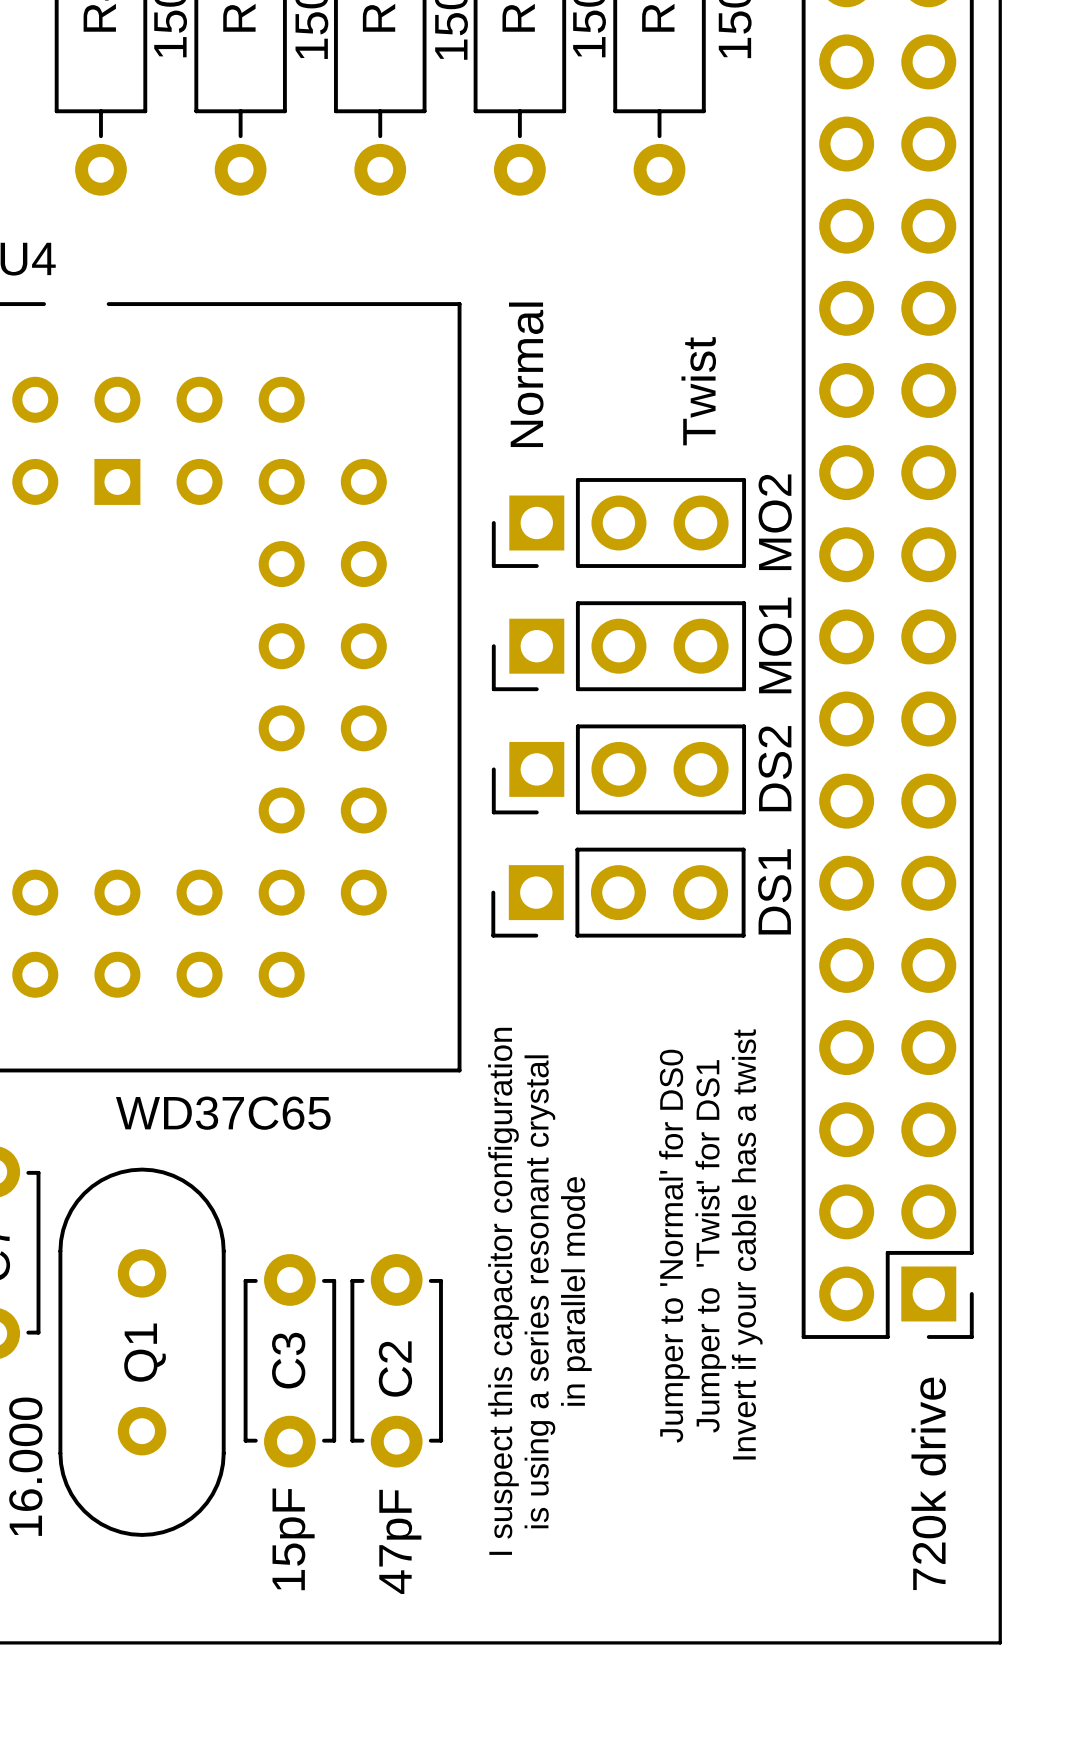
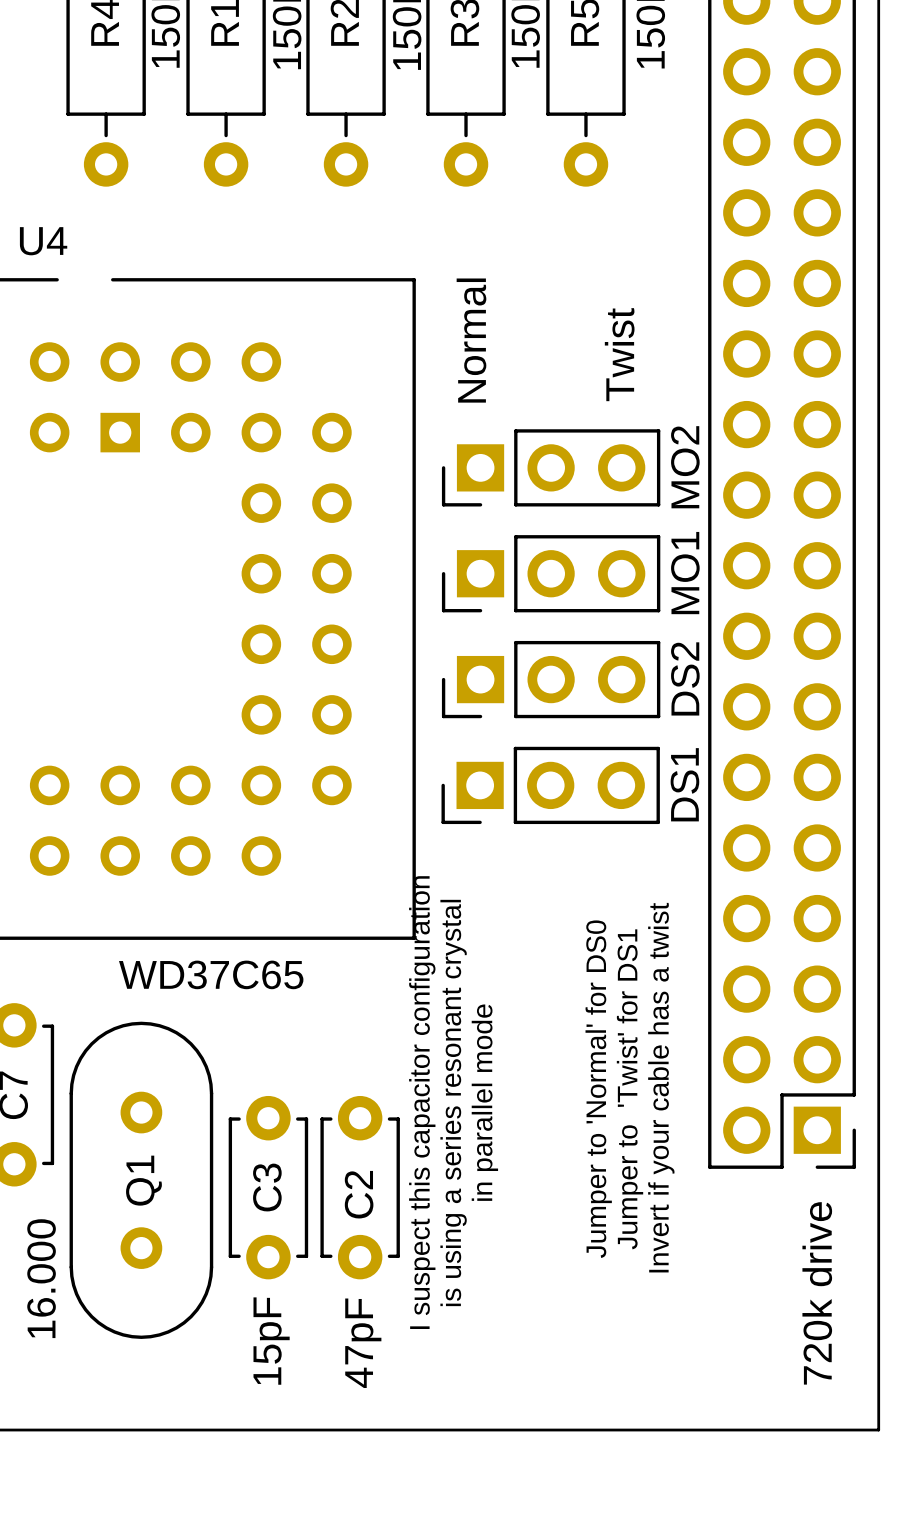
text position: I suspect this capacitor configuration (503, 1291) -> I suspect this capacitor configuration (422, 1102)
text position: is using a series resonant crystal (539, 1291) -> is using a series resonant crystal (453, 1102)
text position: in parallel mode (576, 1291) -> in parallel mode (484, 1102)

